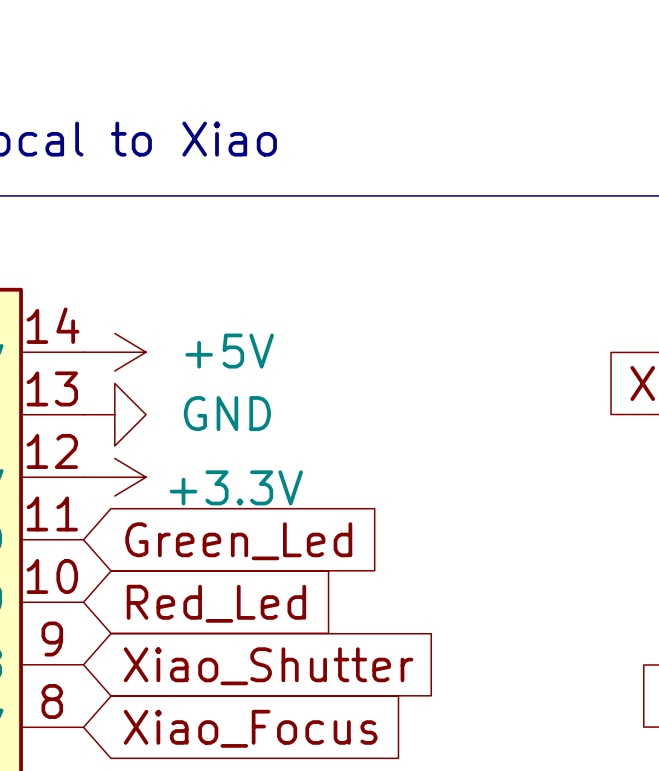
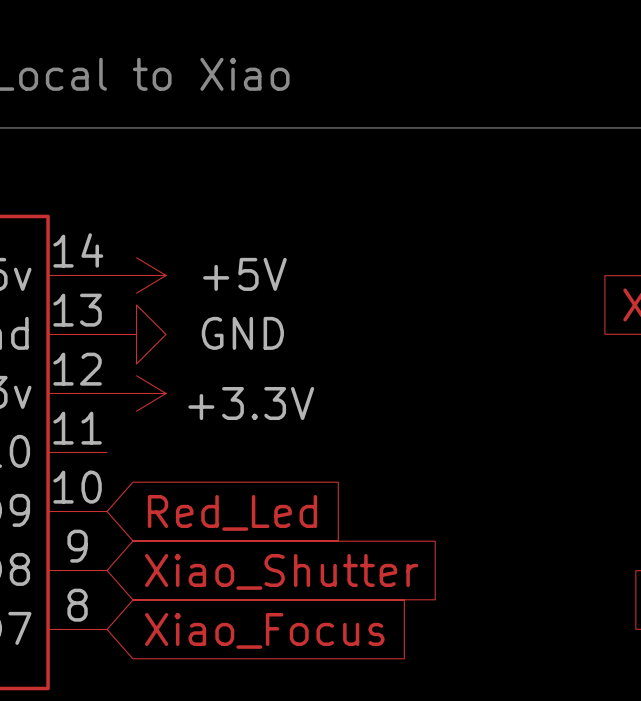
global label: Green_Led (238, 541) -> none

